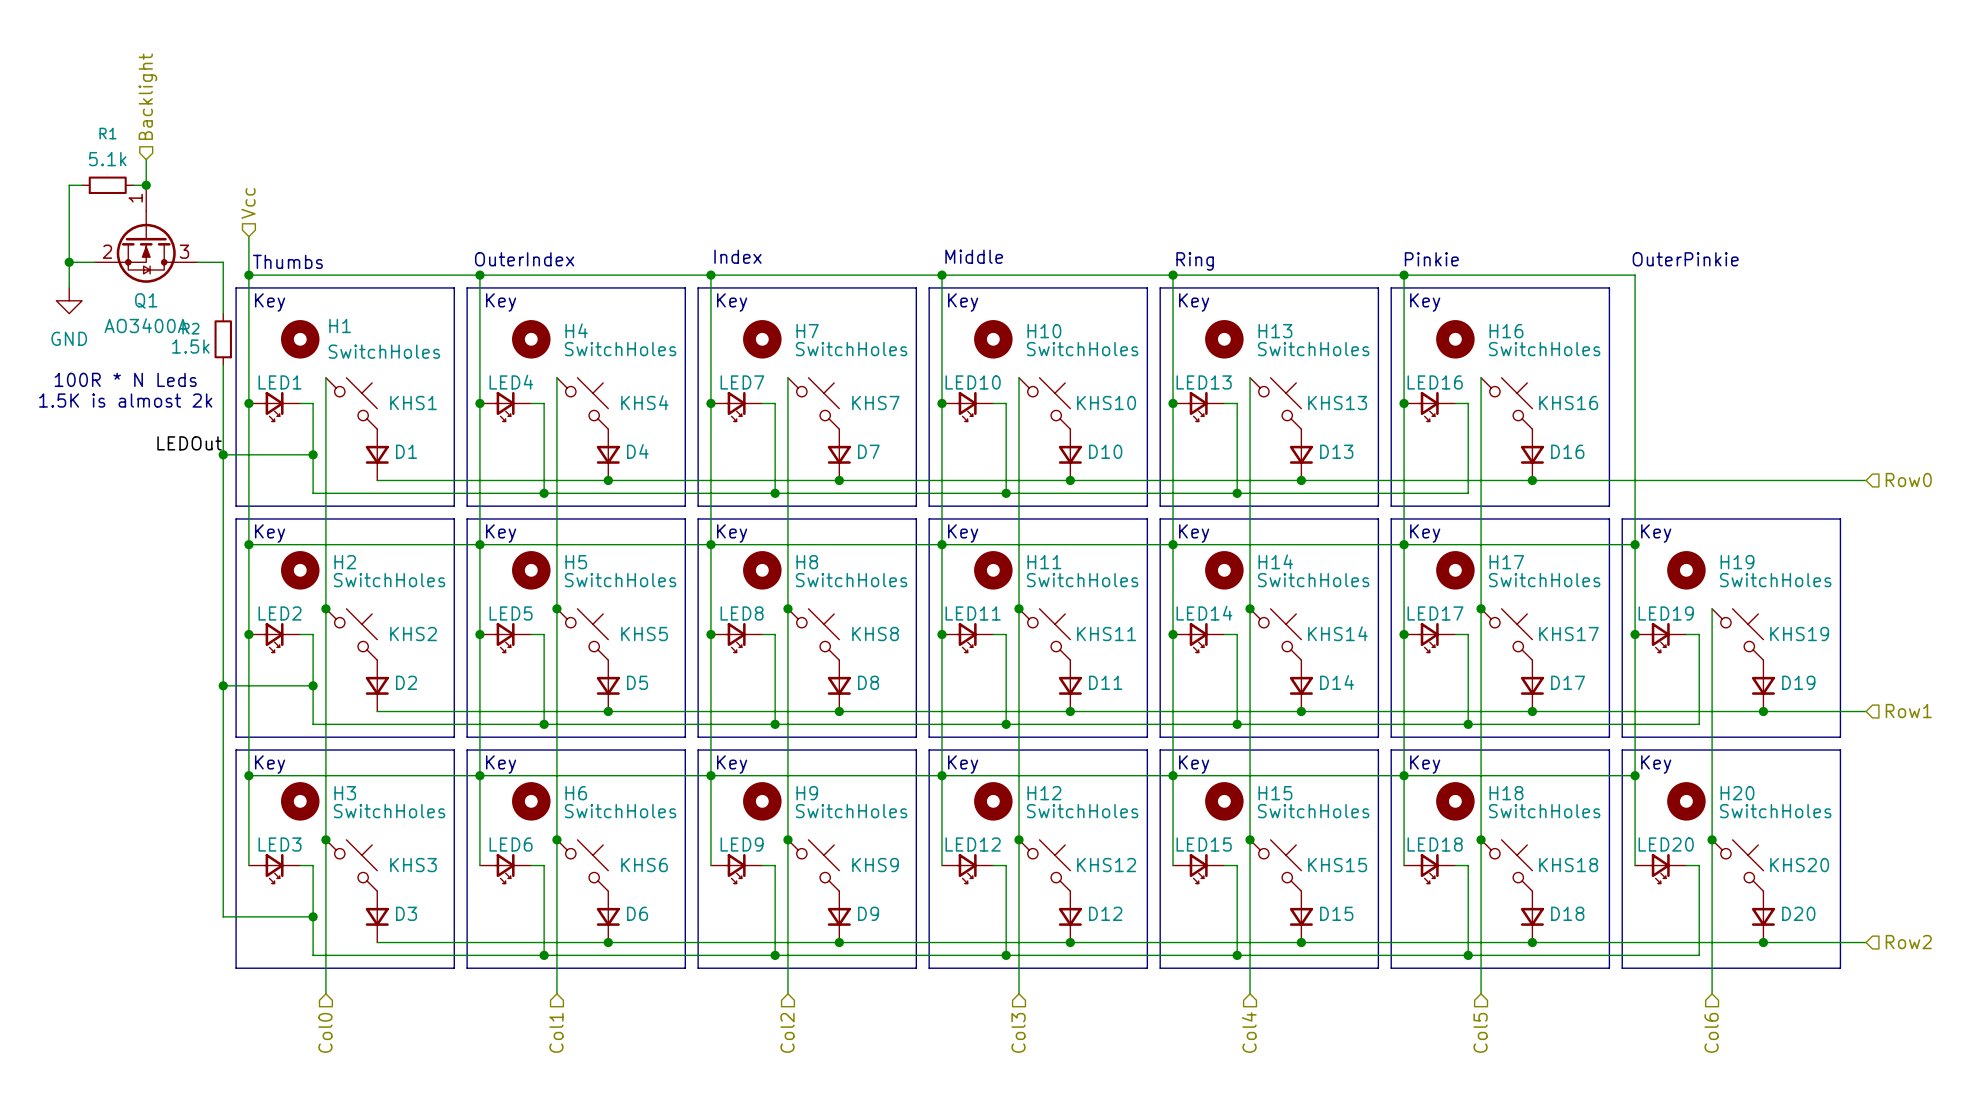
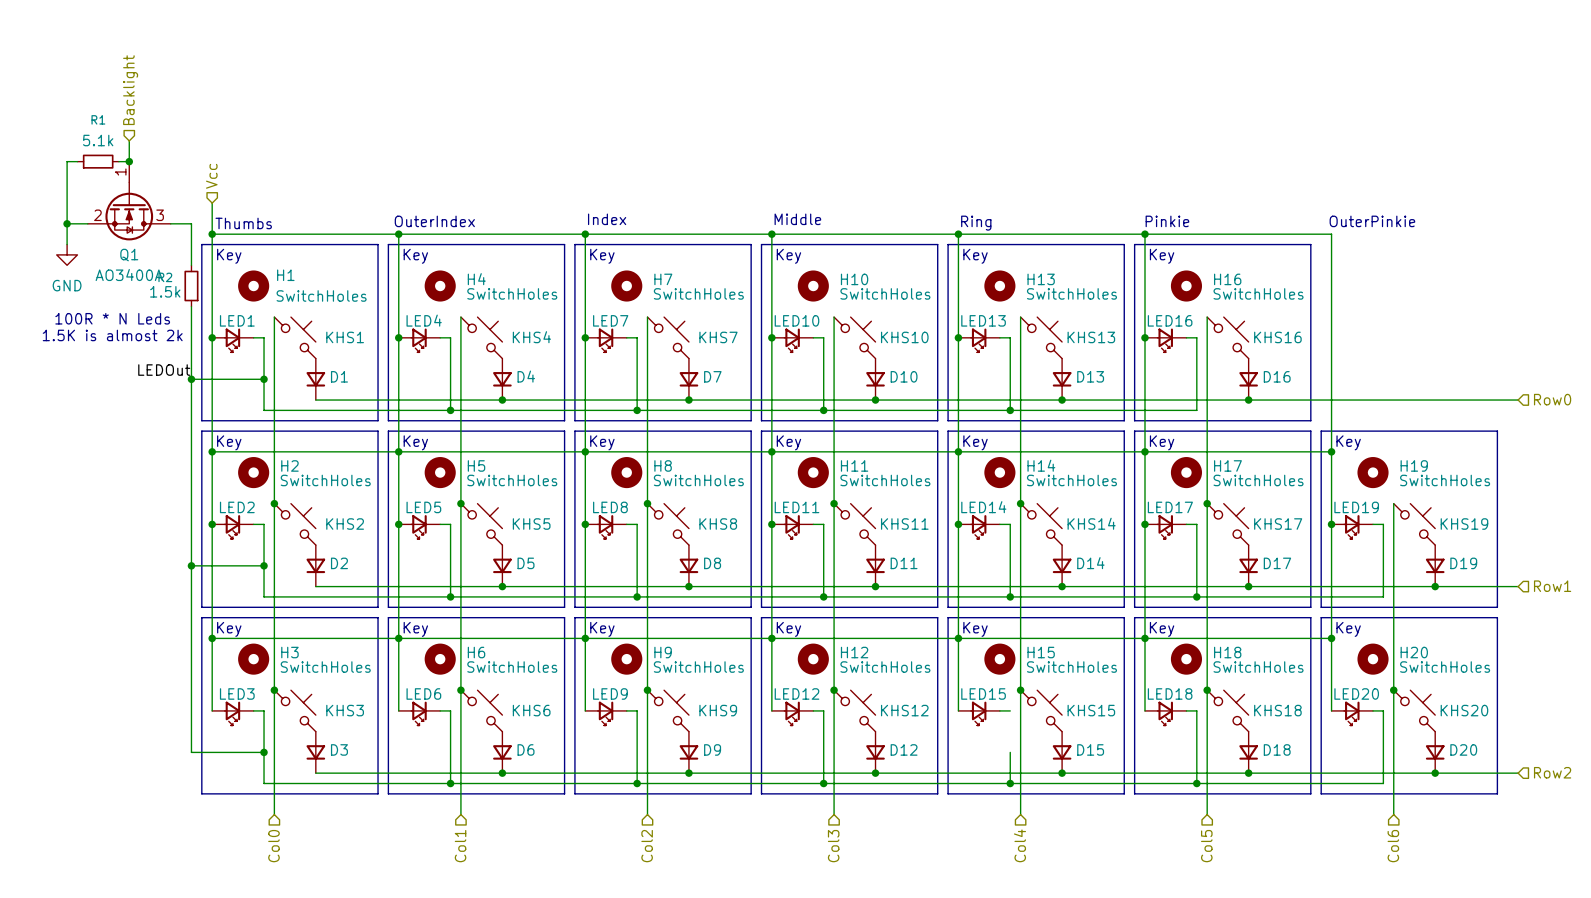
wire: (1237, 865) (1237, 916) -> none

